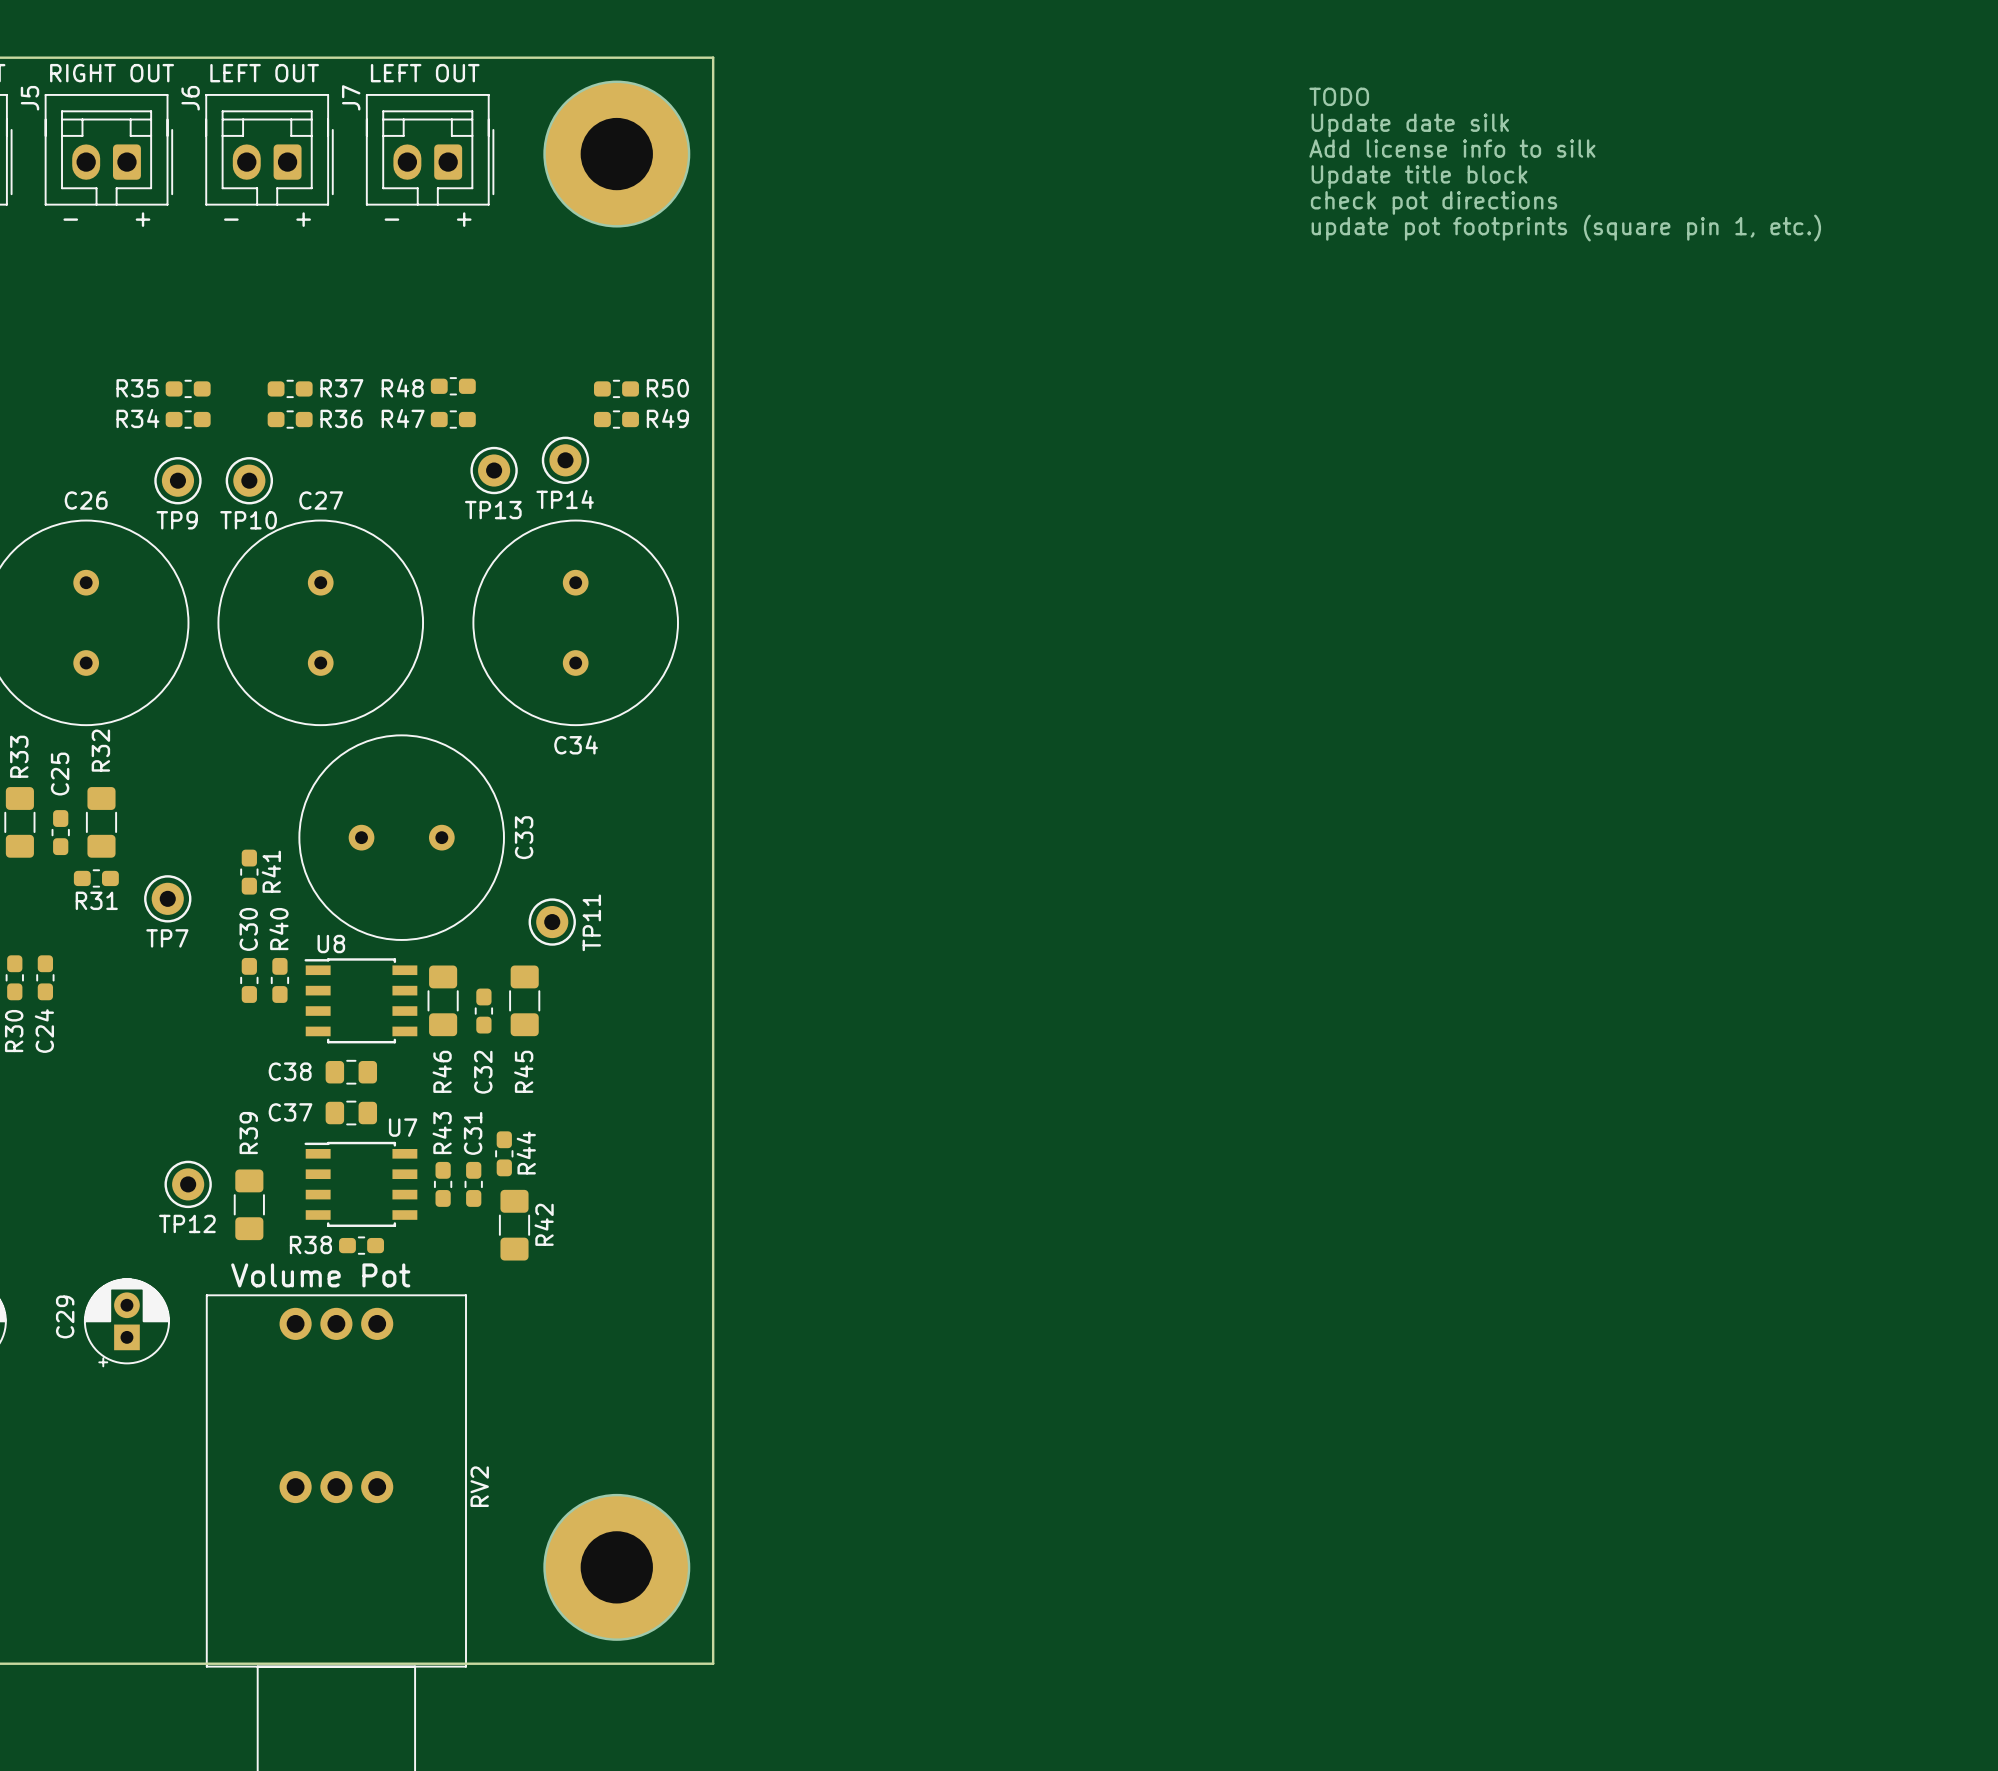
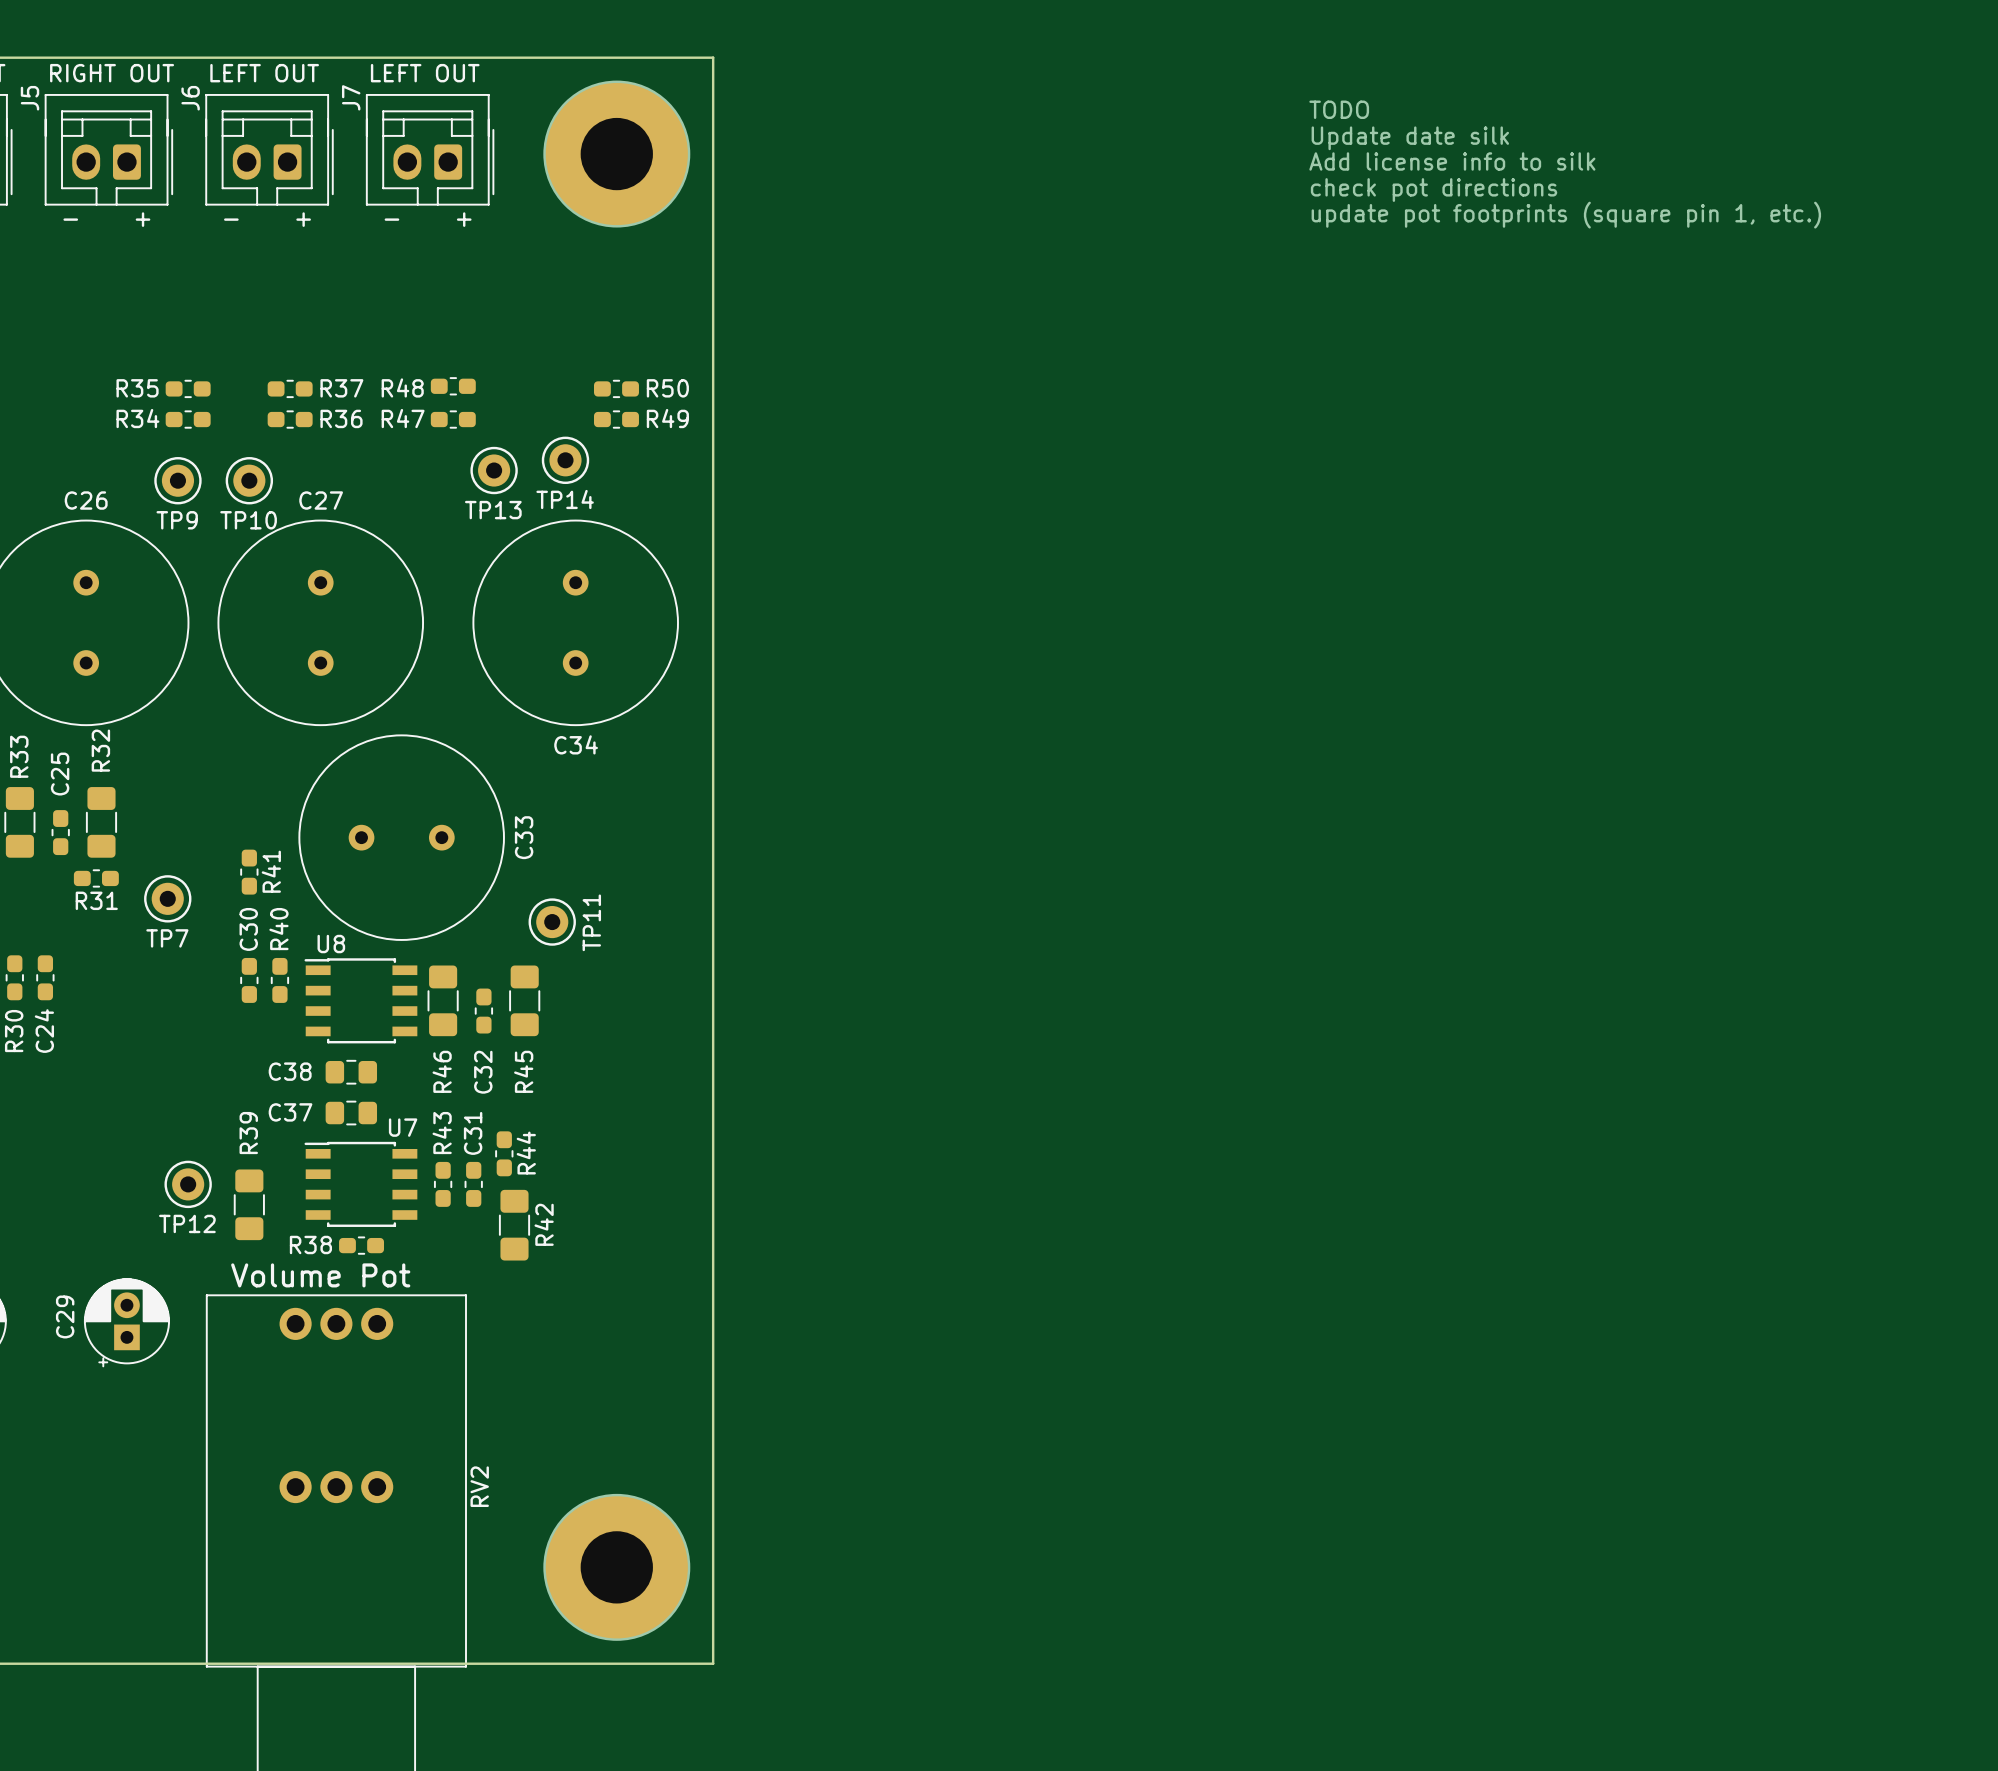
text position: TODO (1339, 96) -> TODO (1339, 109)
text position: Update date silk (1410, 125) -> Update date silk (1410, 138)
text position: Add license info to silk (1452, 148) -> Add license info to silk (1452, 161)
text: Update title block (1419, 177) -> none
text position: check pot directions (1434, 202) -> check pot directions (1434, 190)
text position: update pot footprints (square pin 1, etc.) (1566, 228) -> update pot footprints (square pin 1, etc.) (1566, 215)

